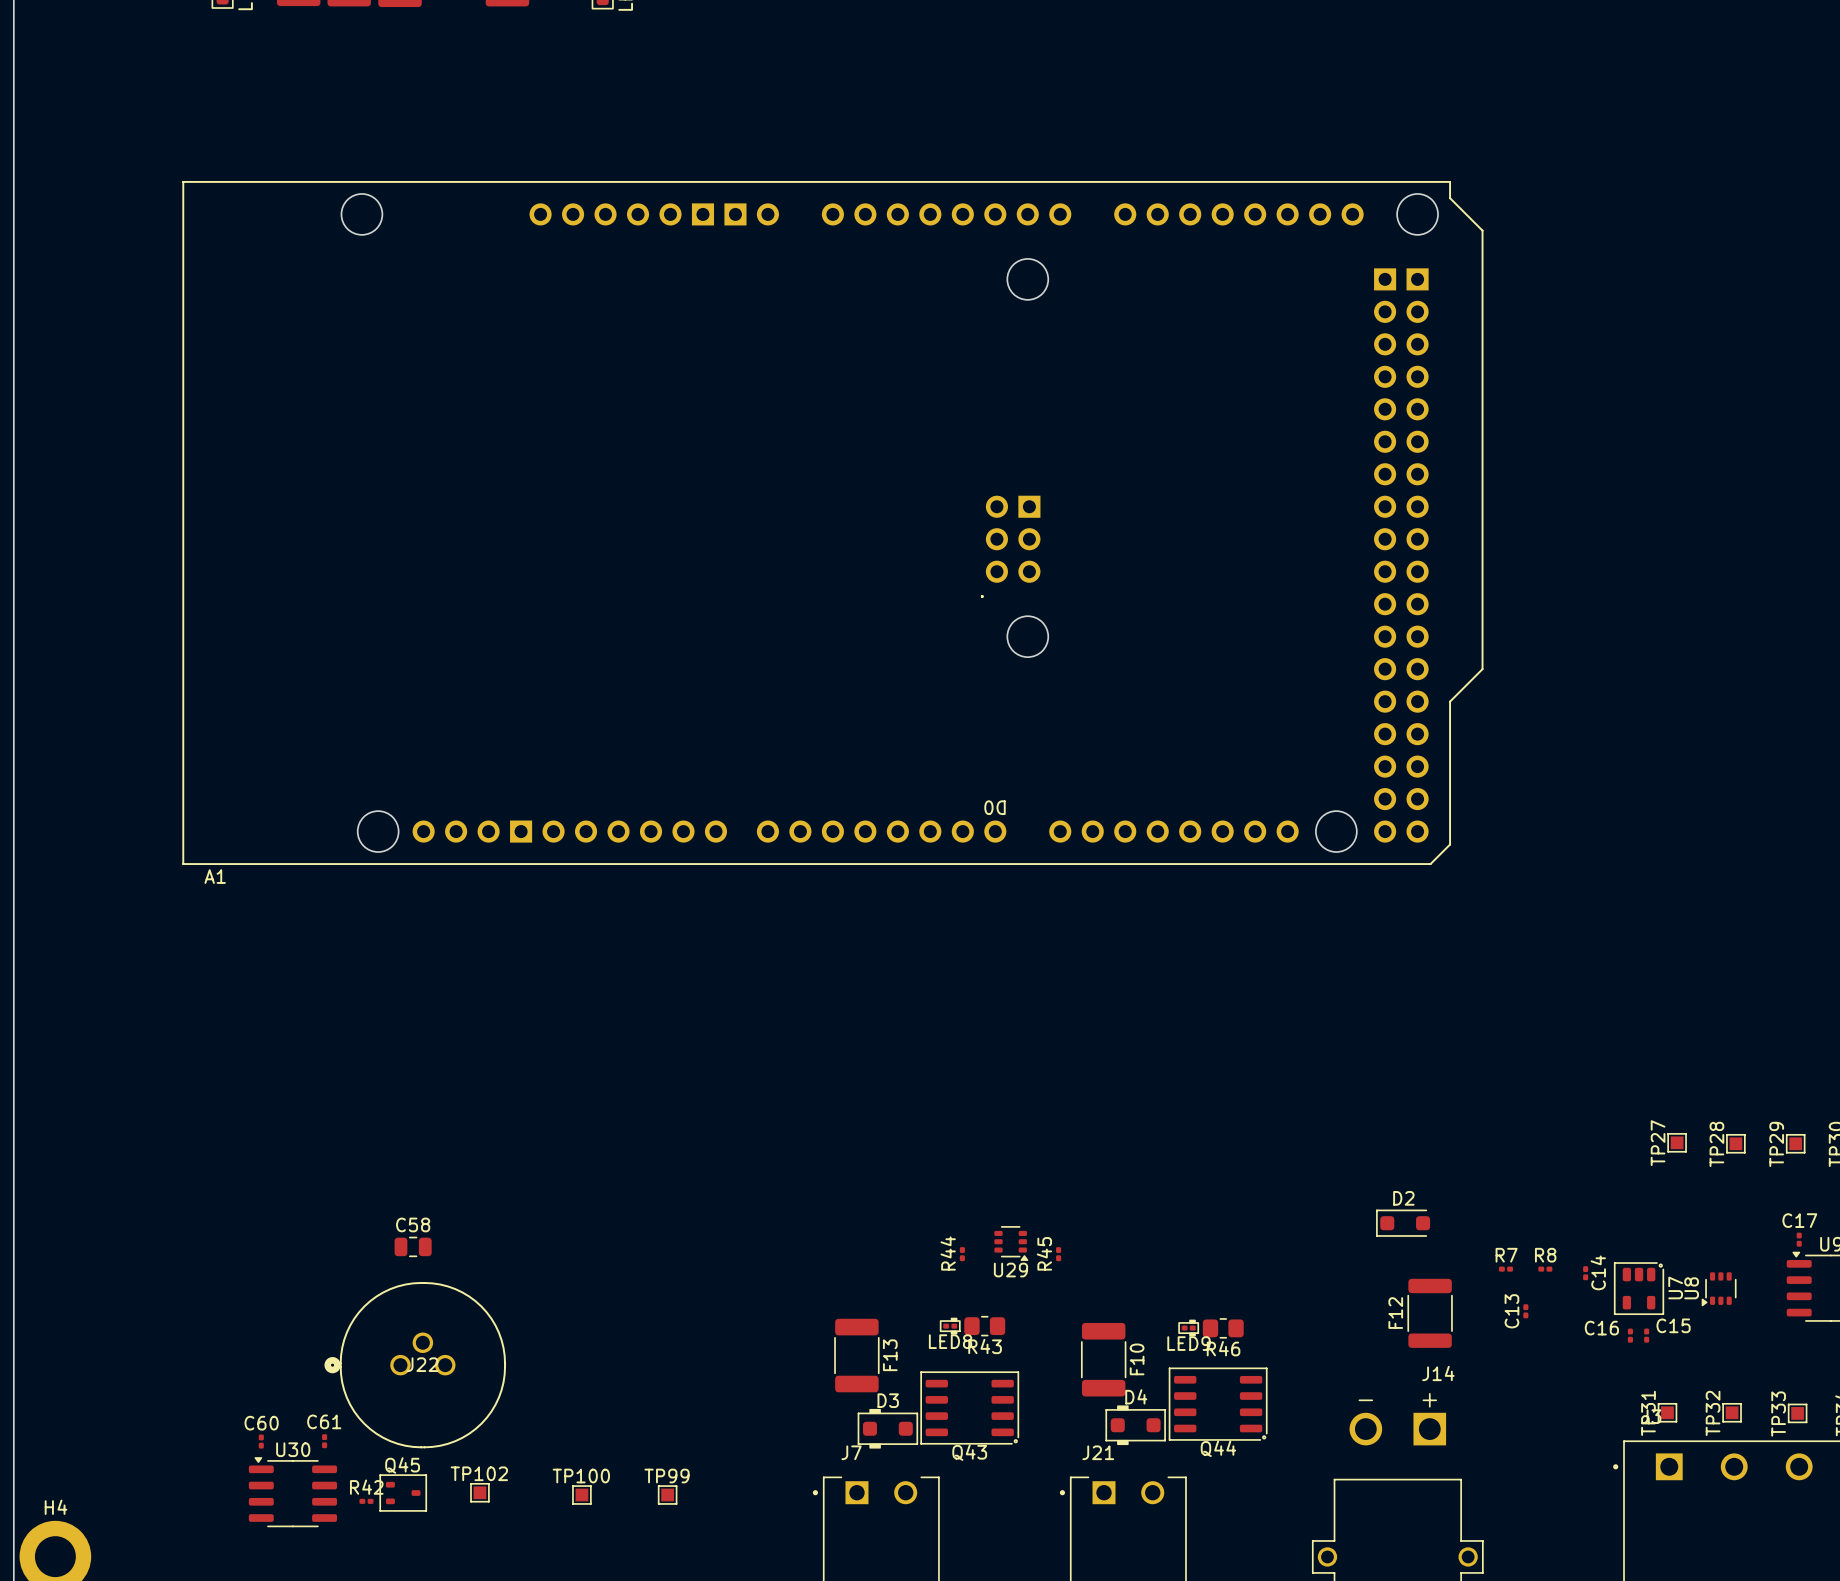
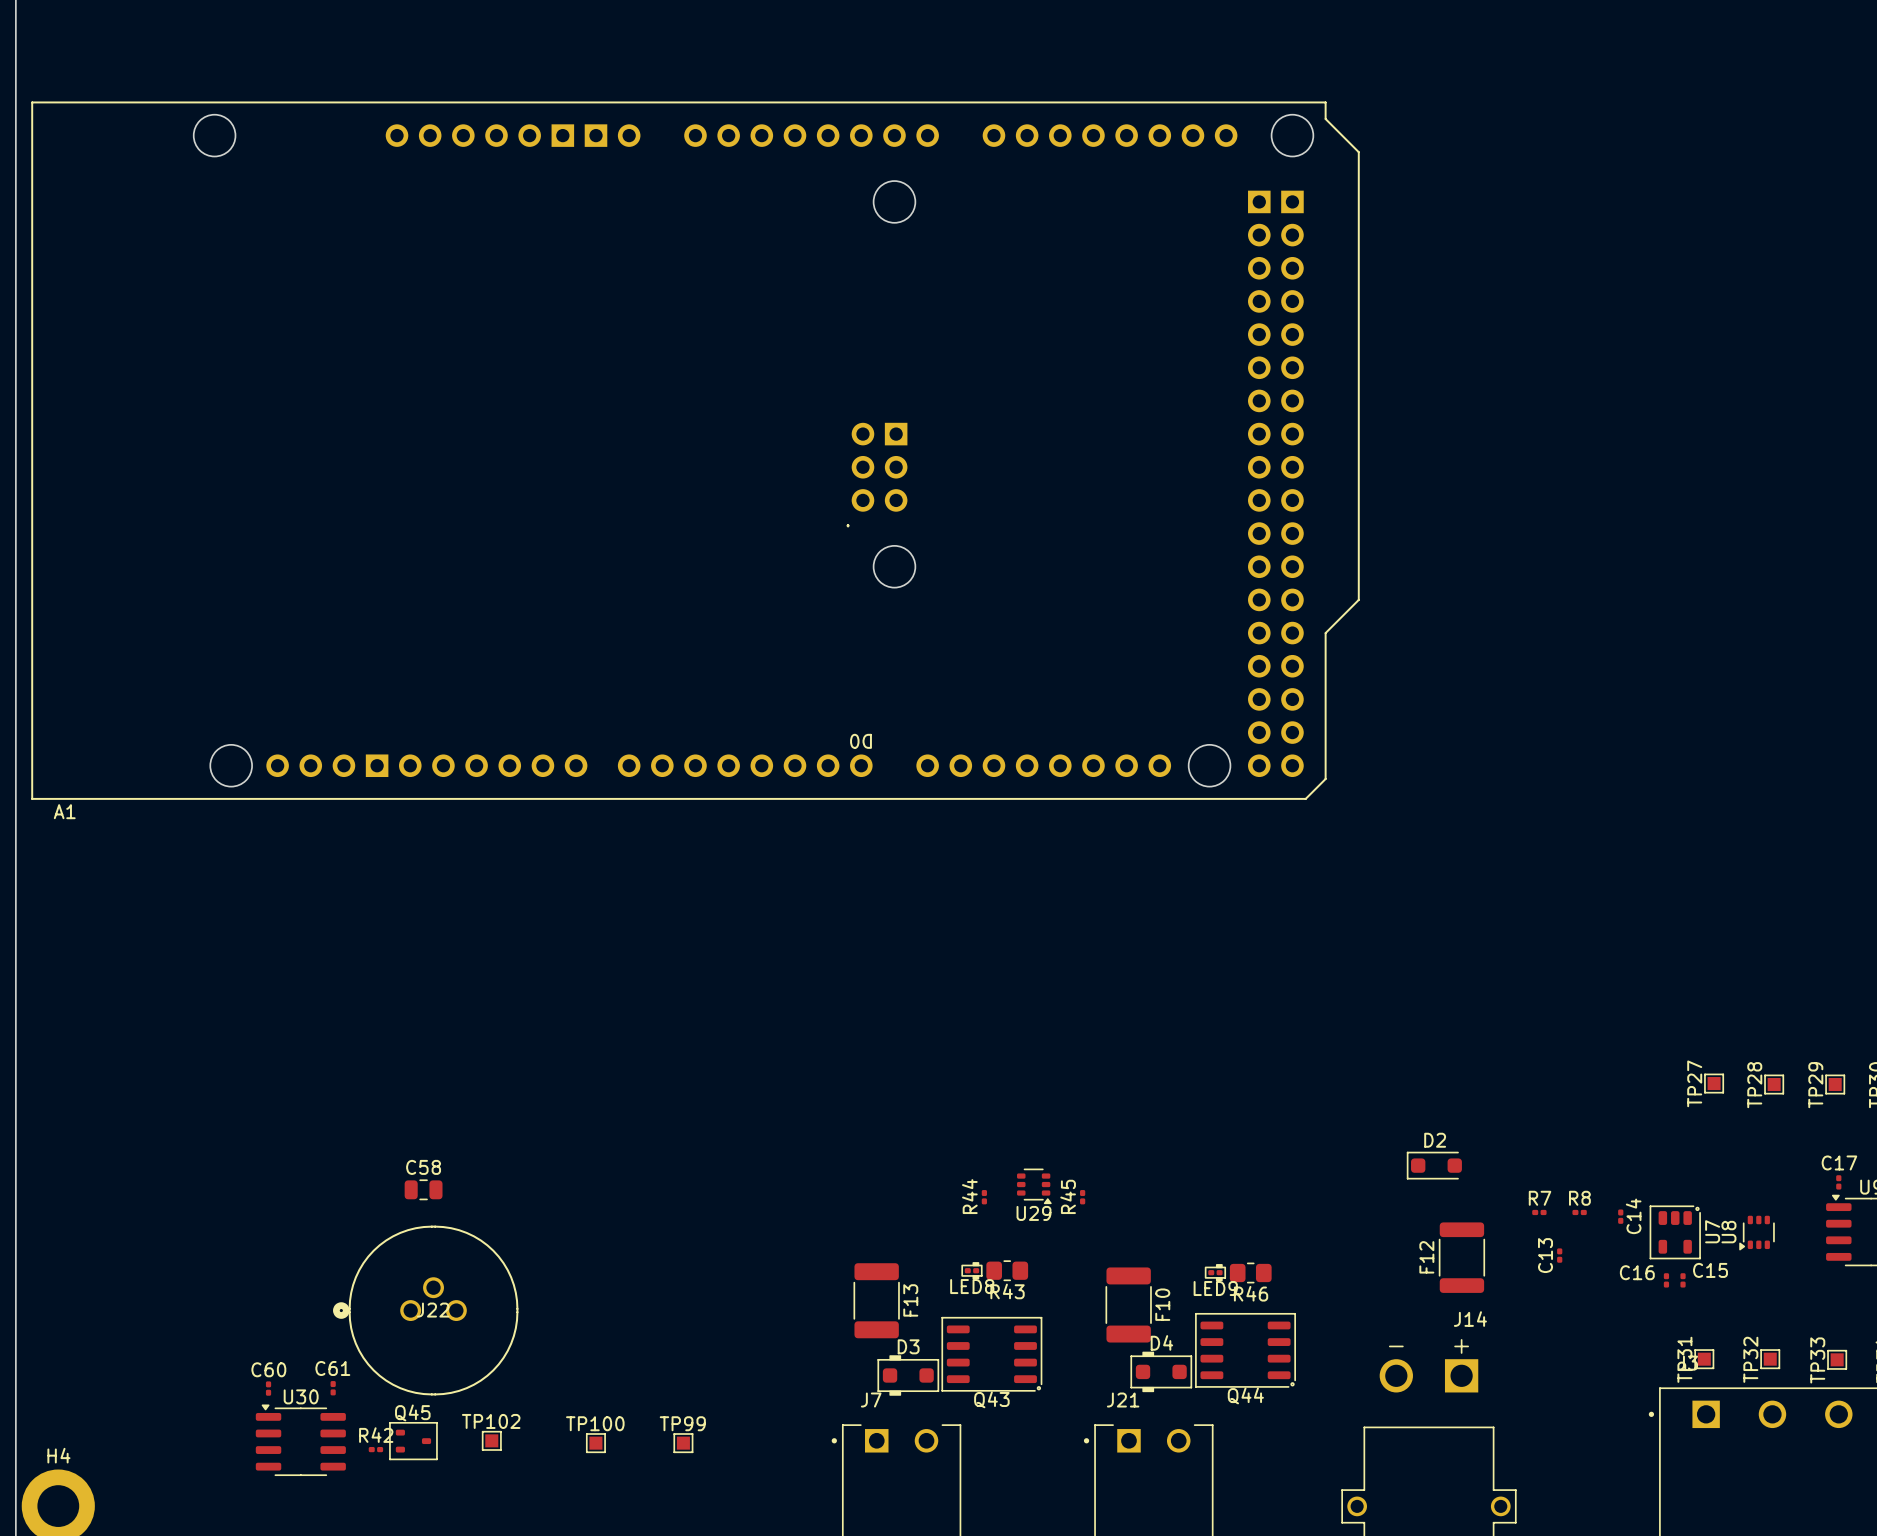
A1 position: (832, 522) -> (695, 450)

